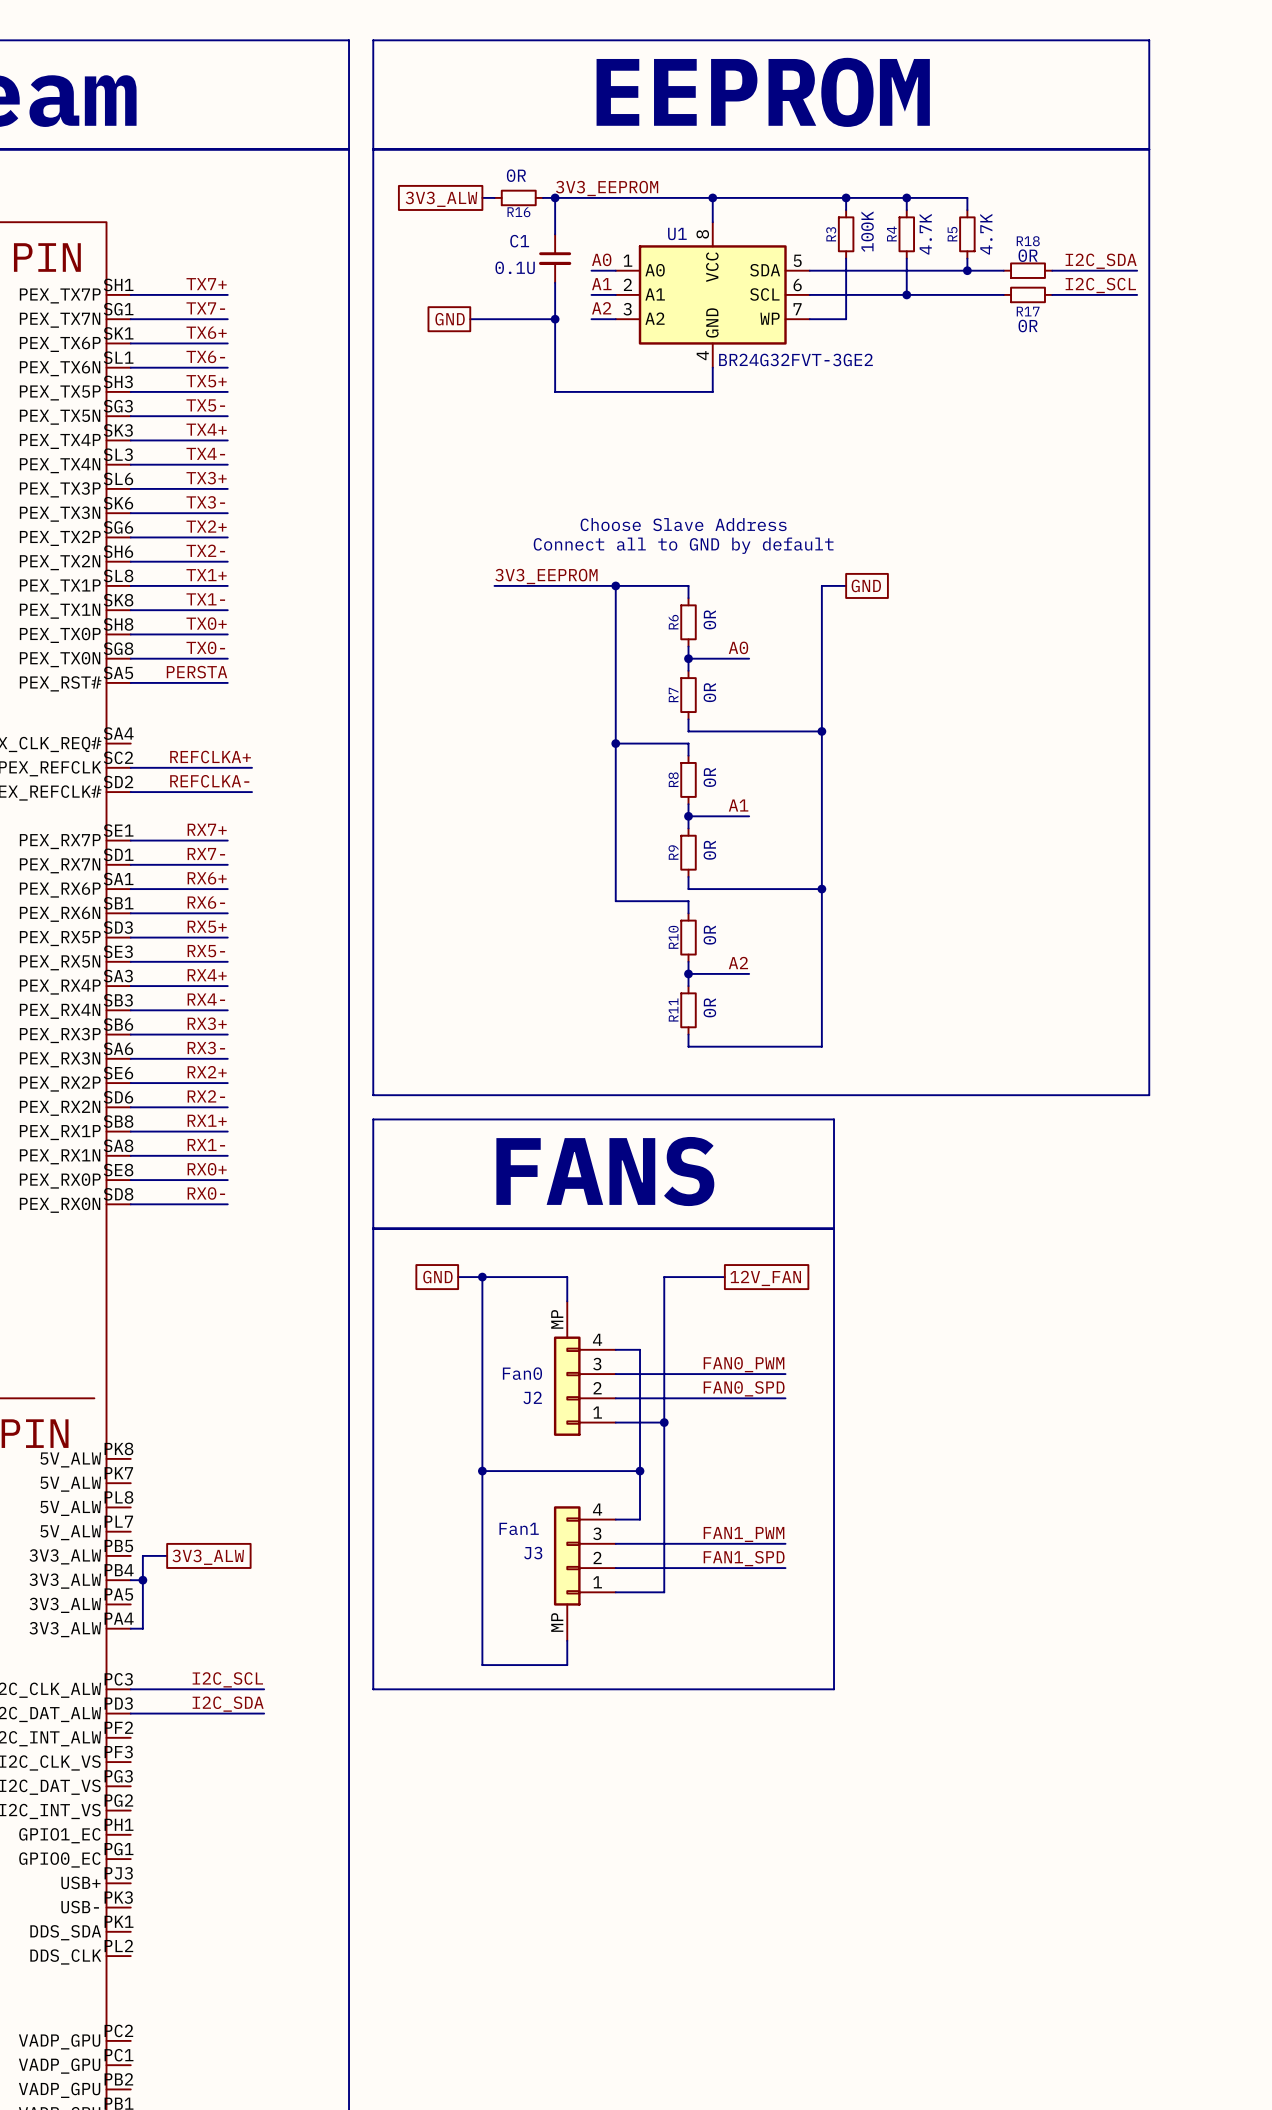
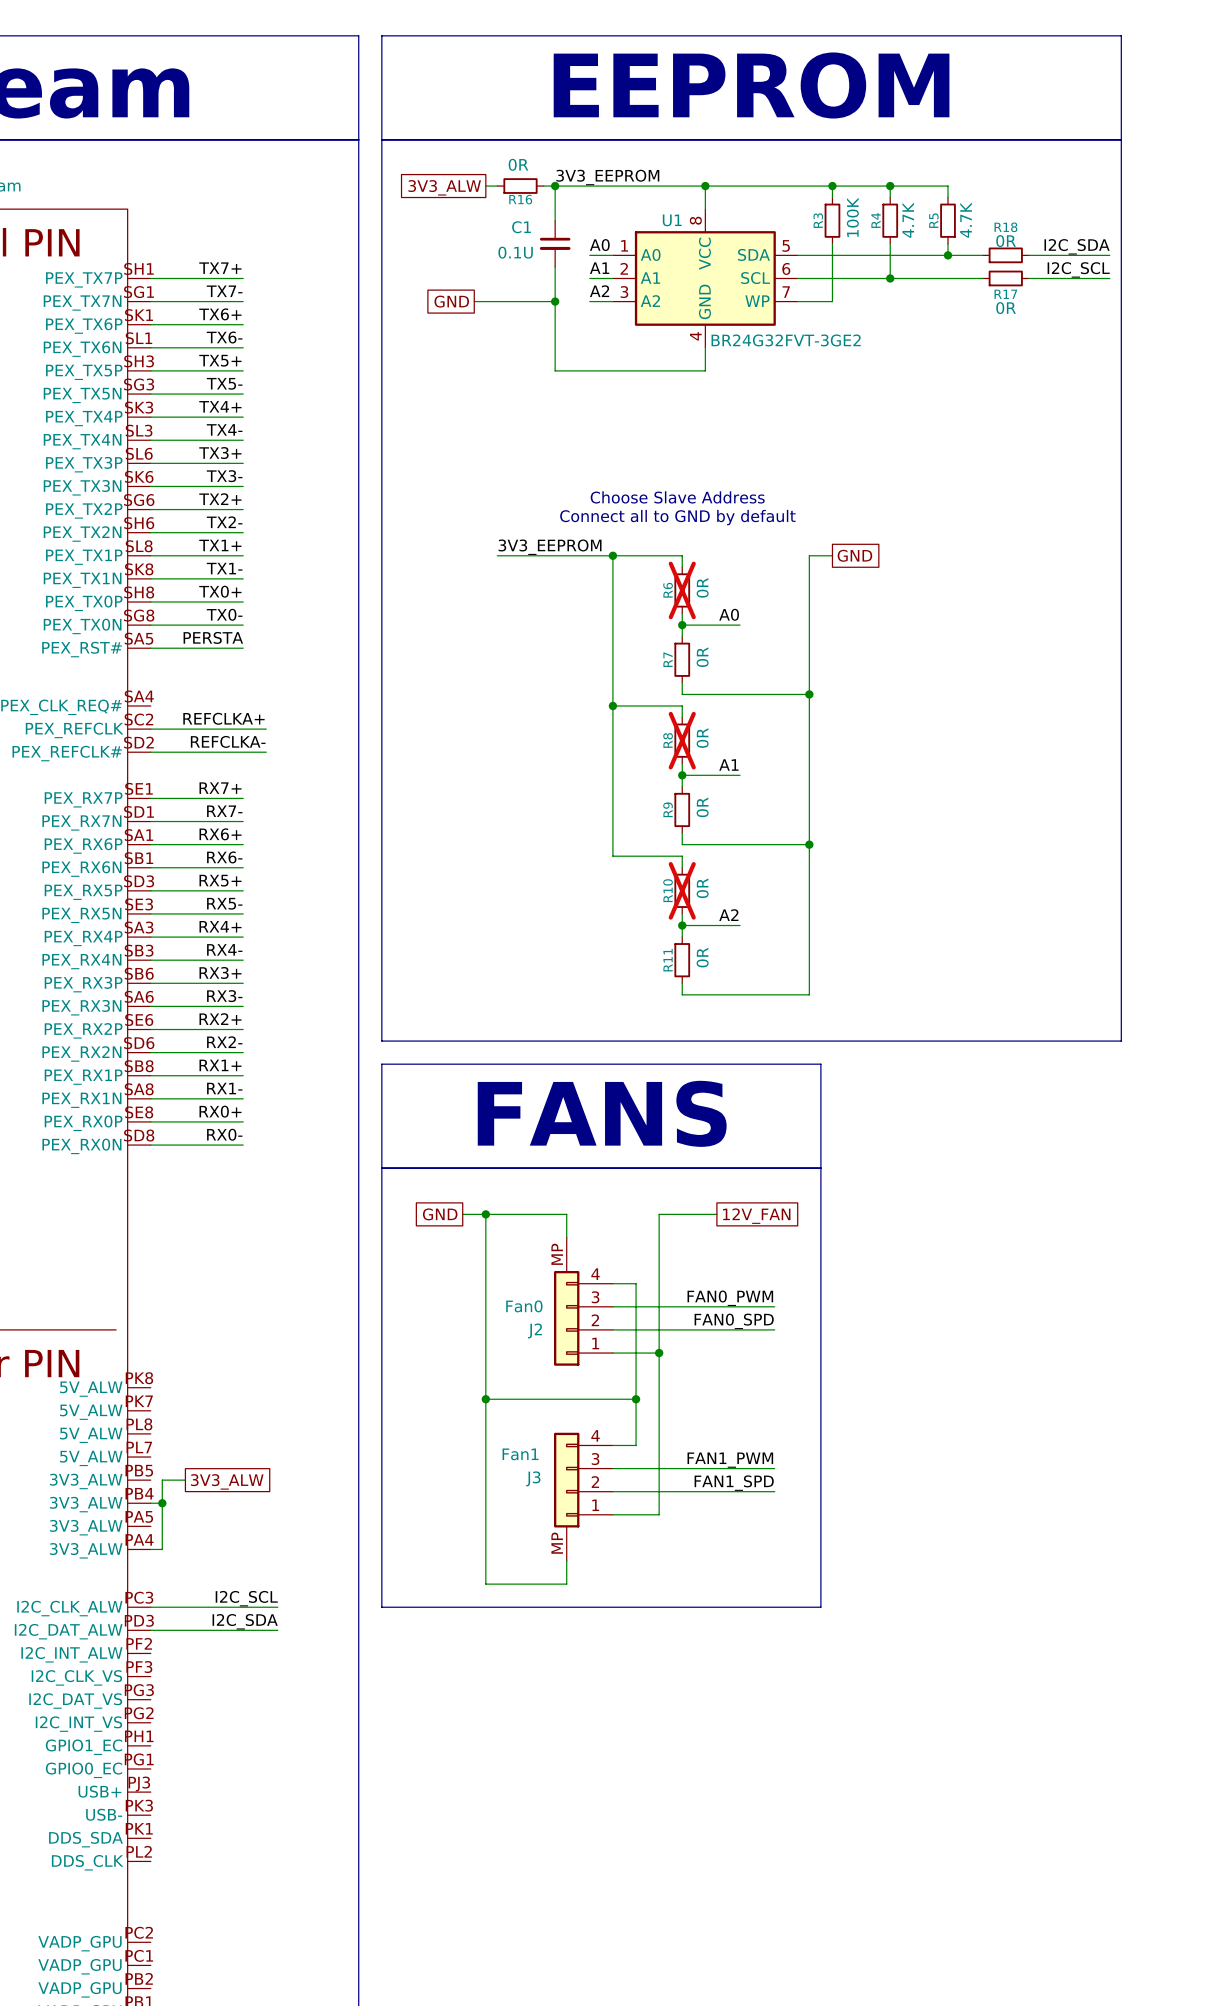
R6 do-not-place cross: none -> (682, 590)
R8 do-not-place cross: none -> (682, 740)
R10 do-not-place cross: none -> (682, 890)

